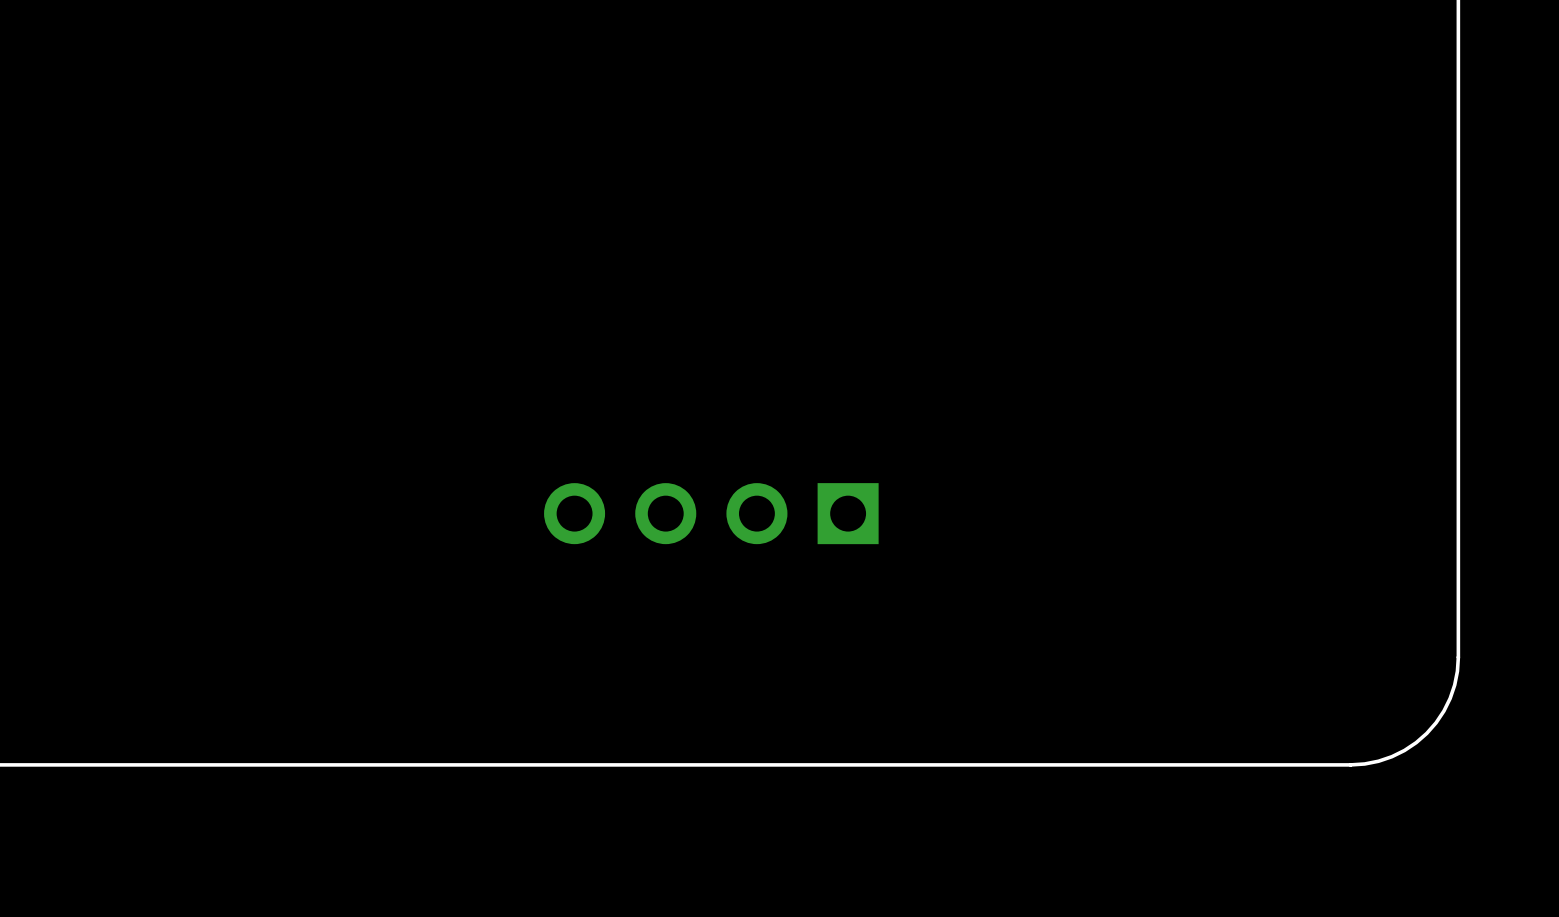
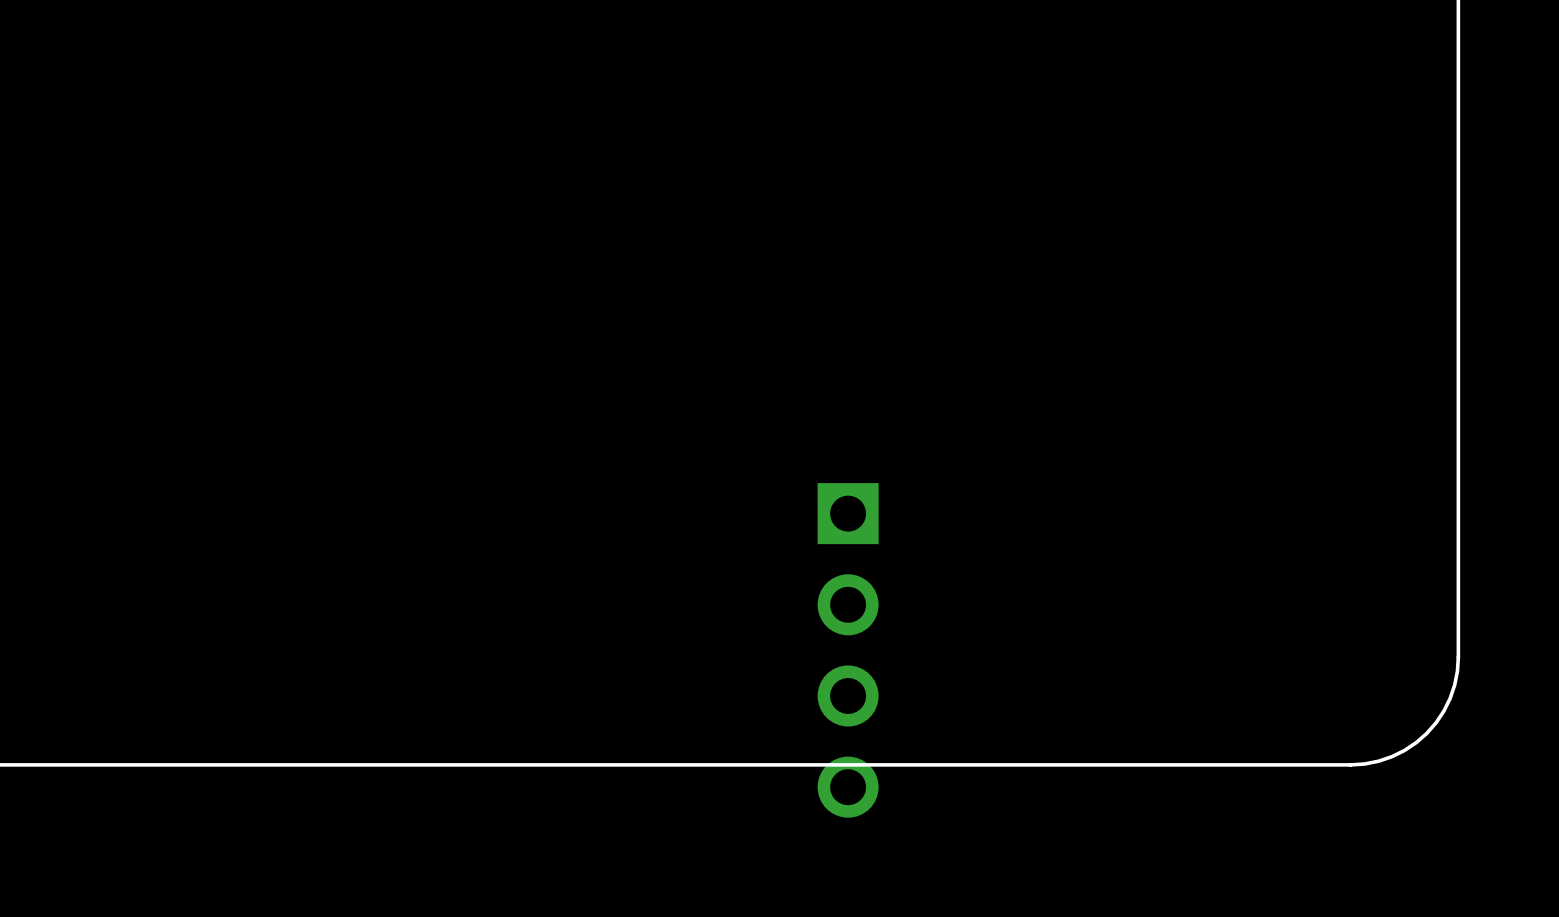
part rotation: 0° (711, 513) -> 90° counterclockwise (848, 650)

